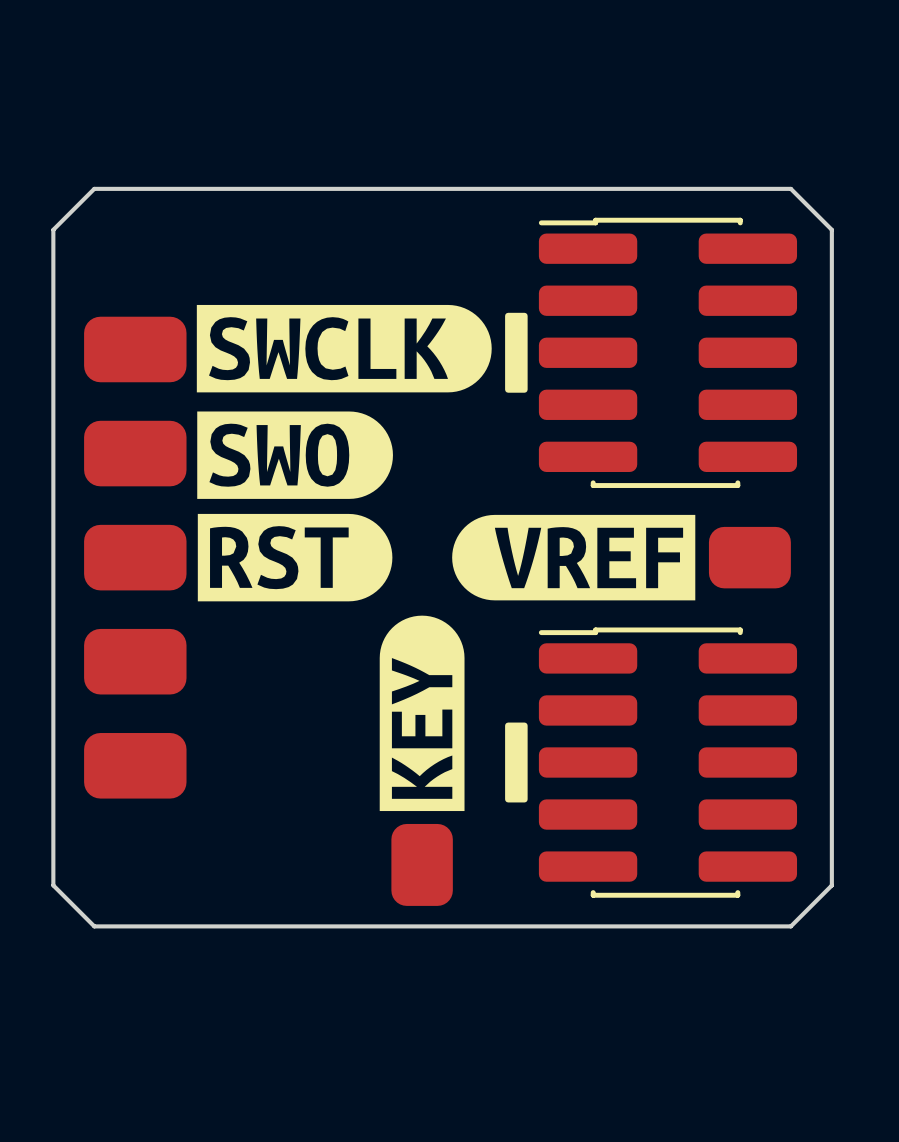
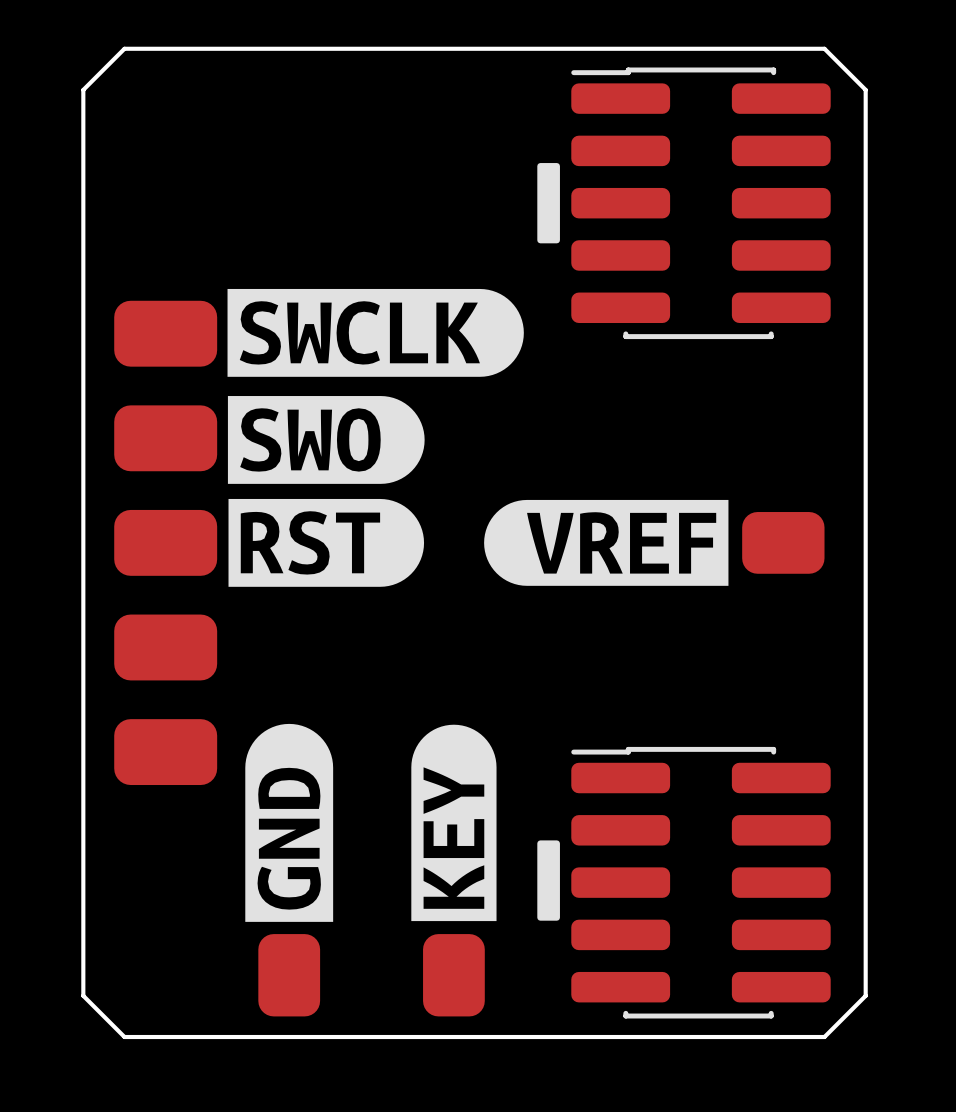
board edge: (53, 229) (94, 188) (790, 188) (831, 229) -> (83, 213) (83, 89) (124, 48) (824, 48) (865, 89) (865, 213)
drawing position: (516, 352) -> (548, 203)
part position: (667, 352) -> (700, 203)
drawing position: (422, 713) -> (453, 822)
drawing: none -> [245, 723, 334, 922]
drawing position: (516, 762) -> (548, 880)
part position: (667, 762) -> (700, 882)
part: (422, 864) -> none
board edge: (53, 885) (94, 926) (790, 926) (831, 885) -> (83, 872) (83, 995) (124, 1037) (824, 1037) (865, 995) (865, 872)
part: none -> (289, 975)
part: none -> (453, 975)

